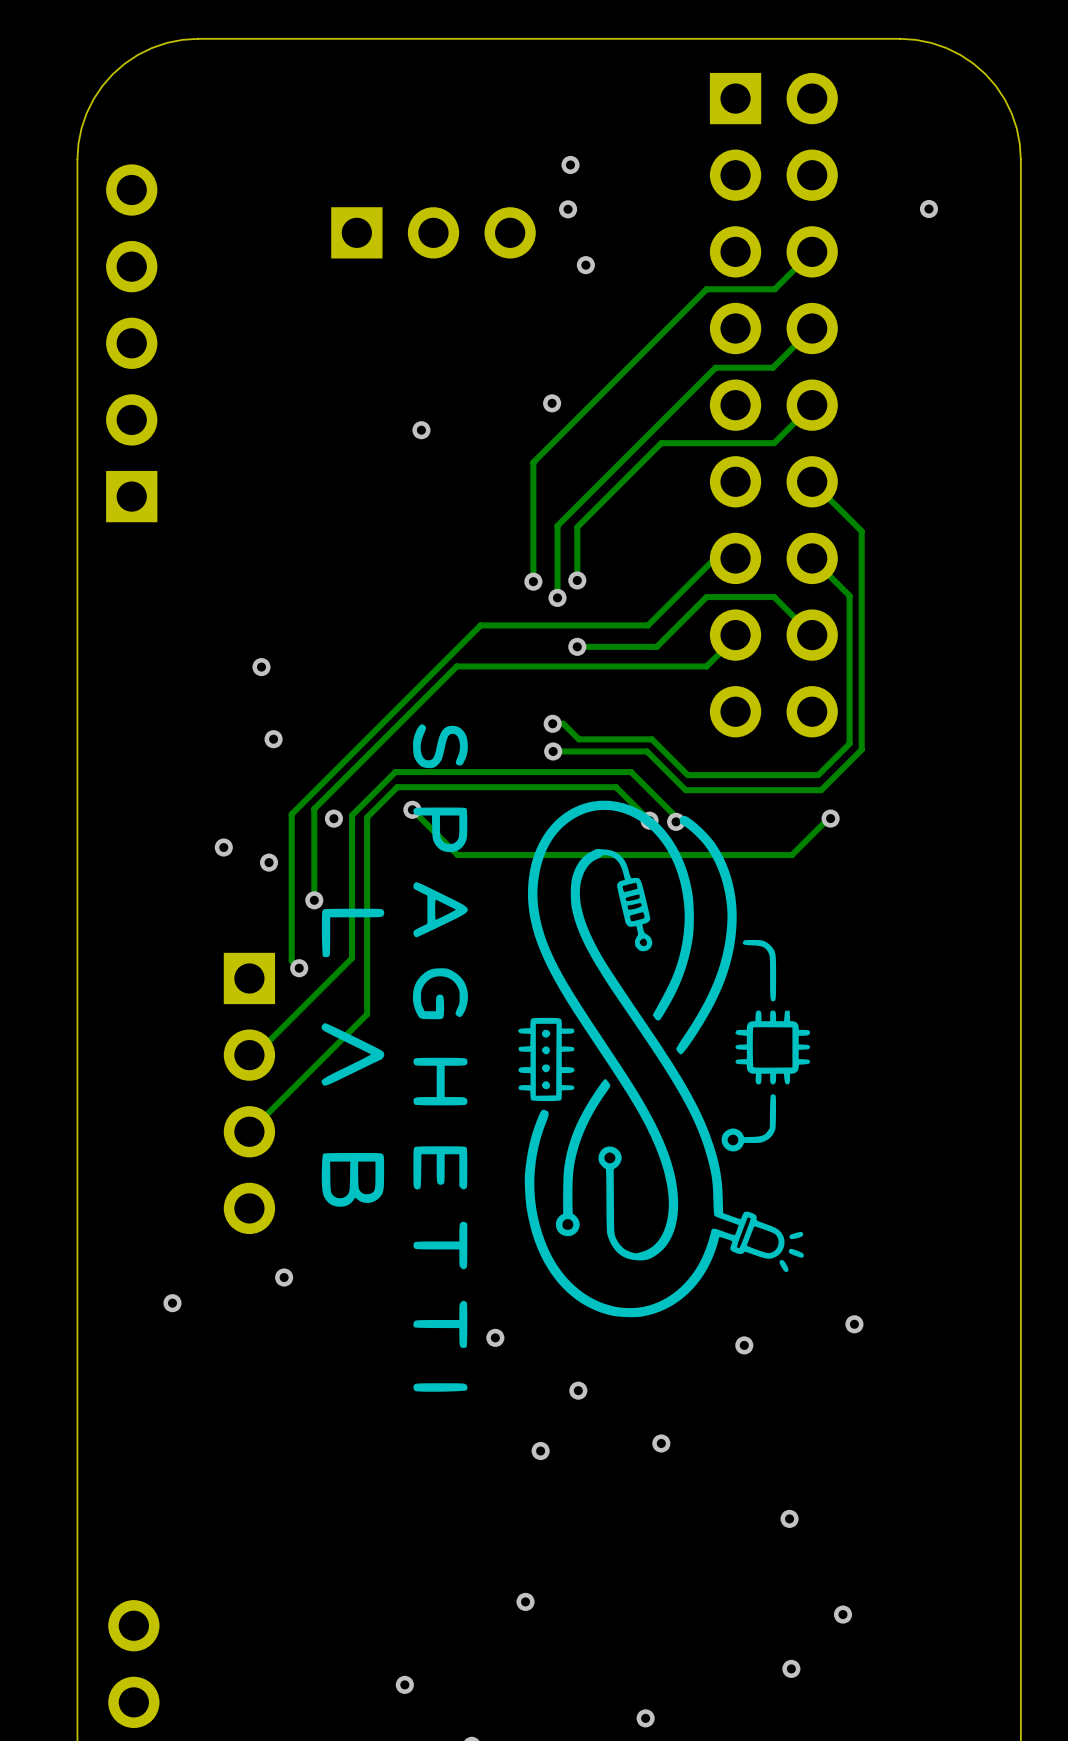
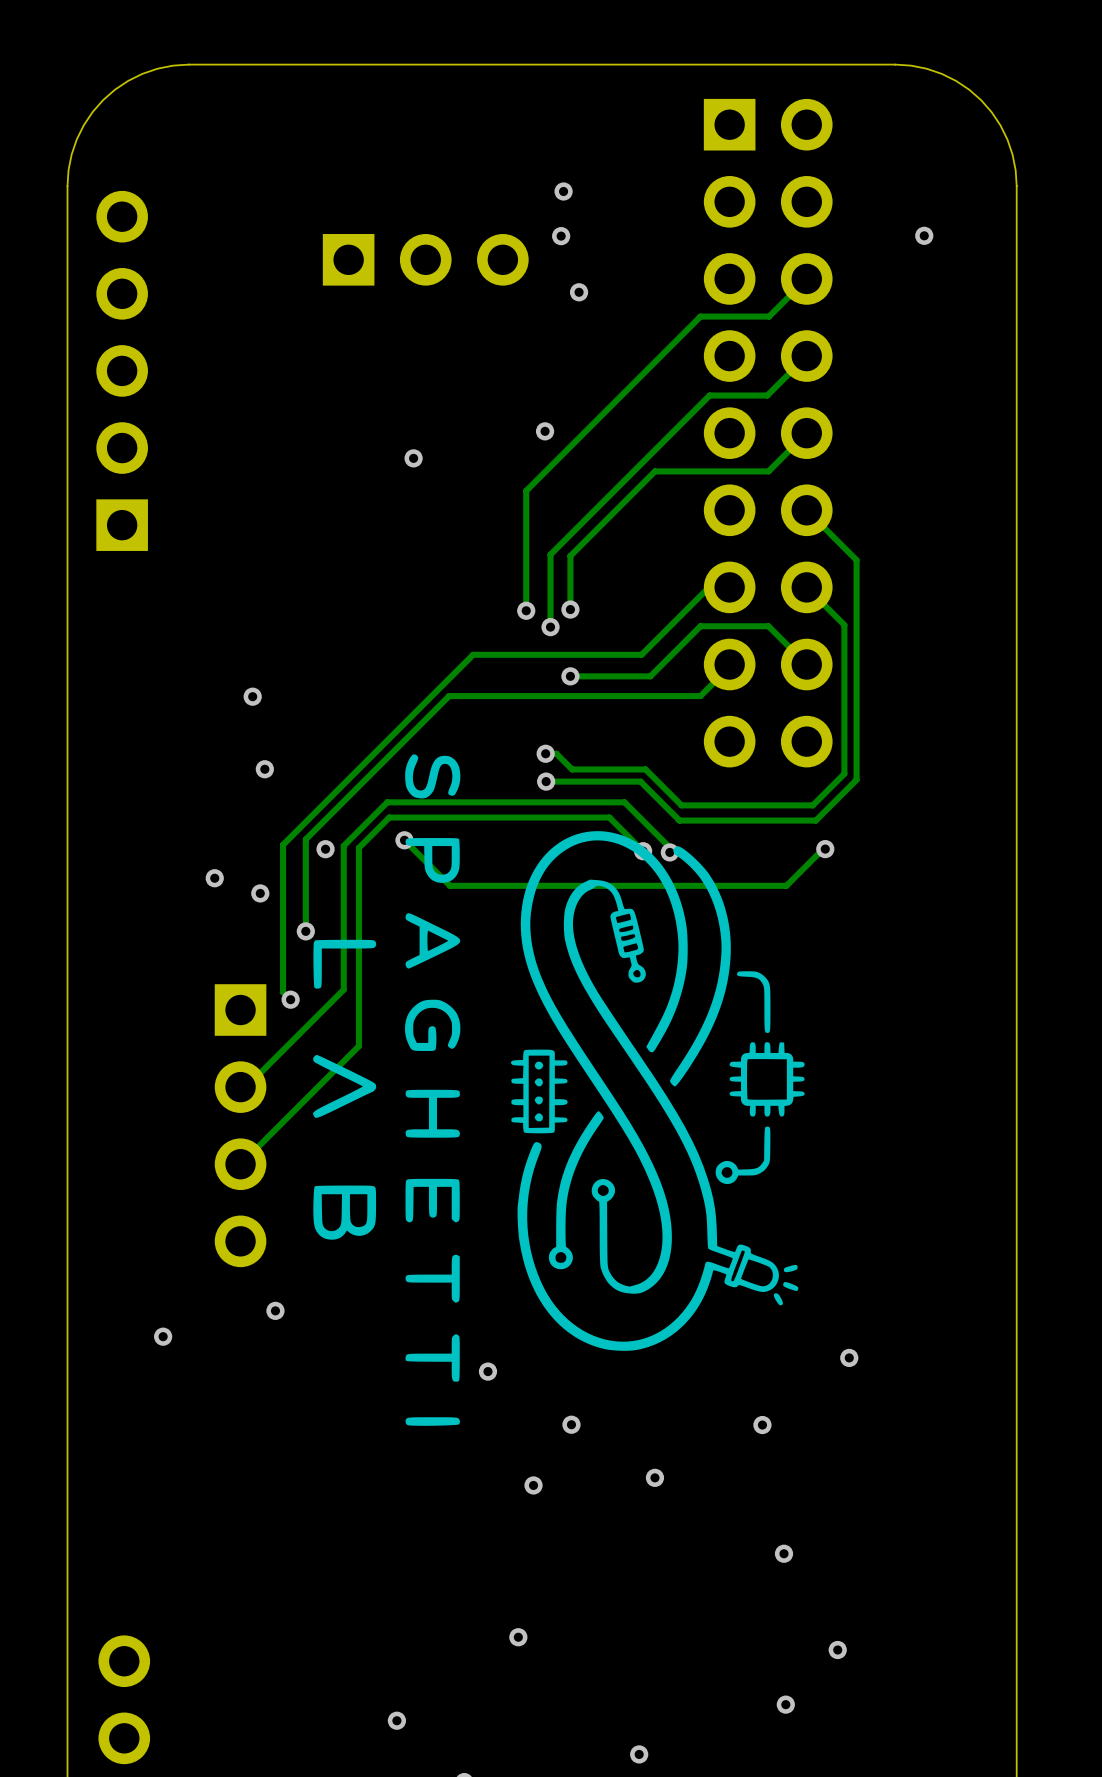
via position: (744, 1345) -> (762, 1425)

